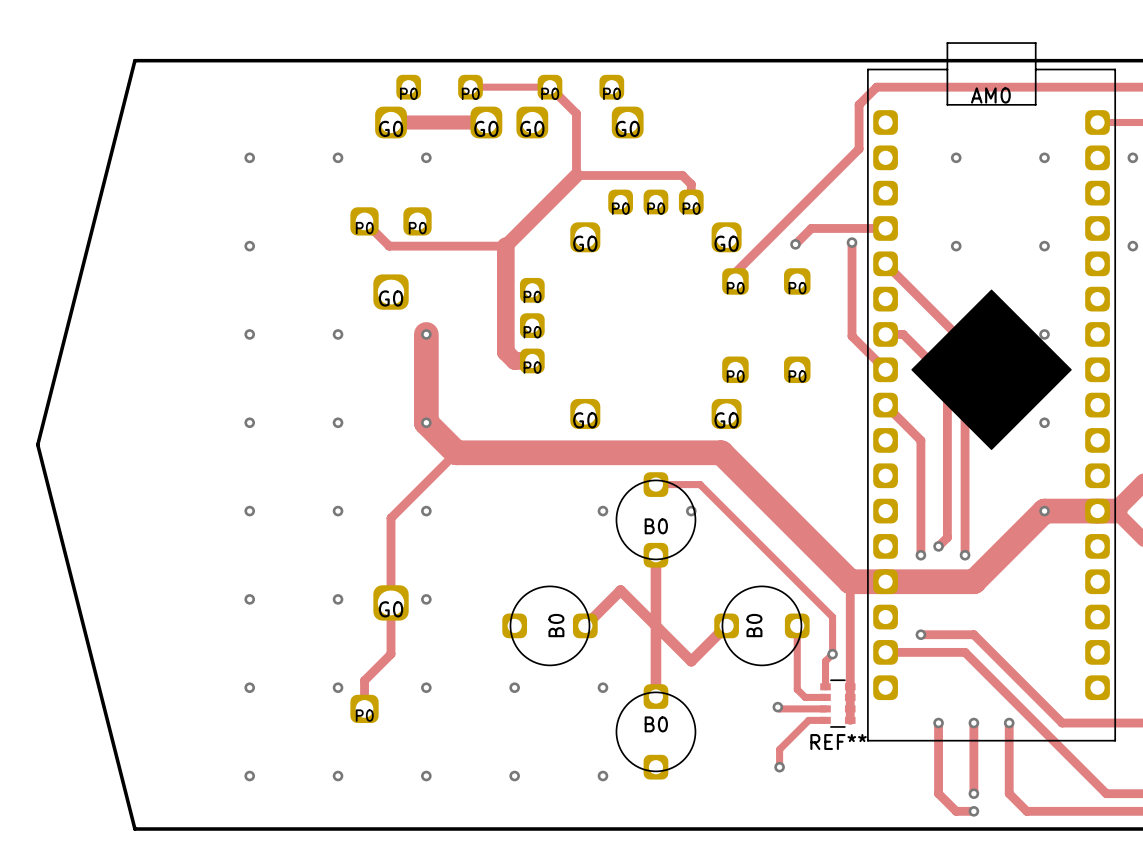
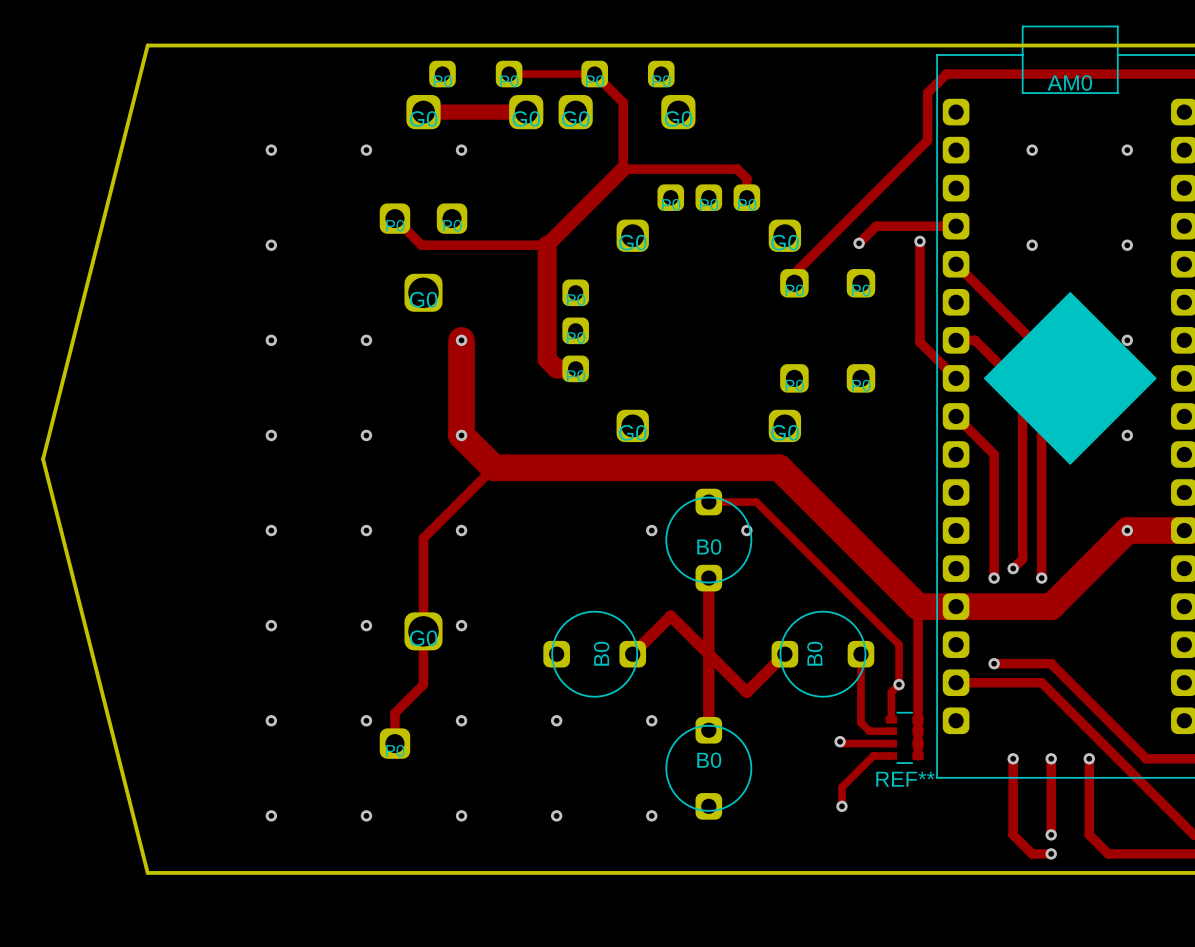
G0 footprint: [373, 274, 409, 310] -> [404, 273, 443, 312]
G0 footprint: [373, 585, 409, 621] -> [404, 612, 443, 651]

